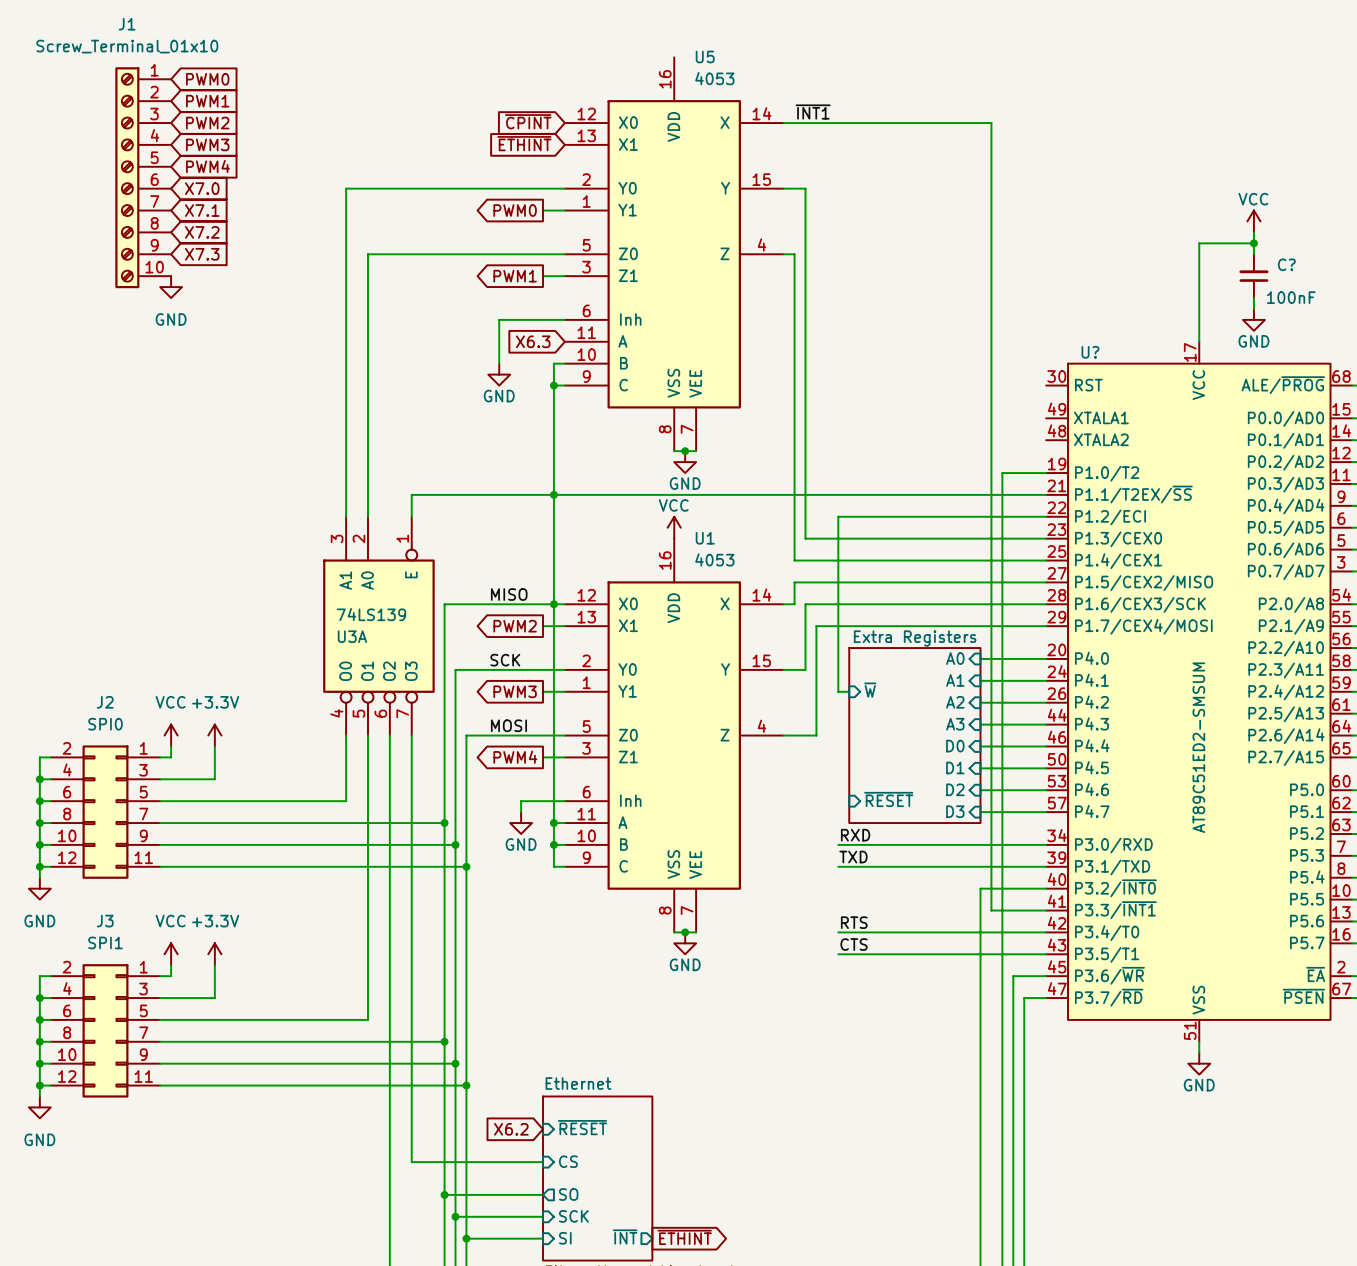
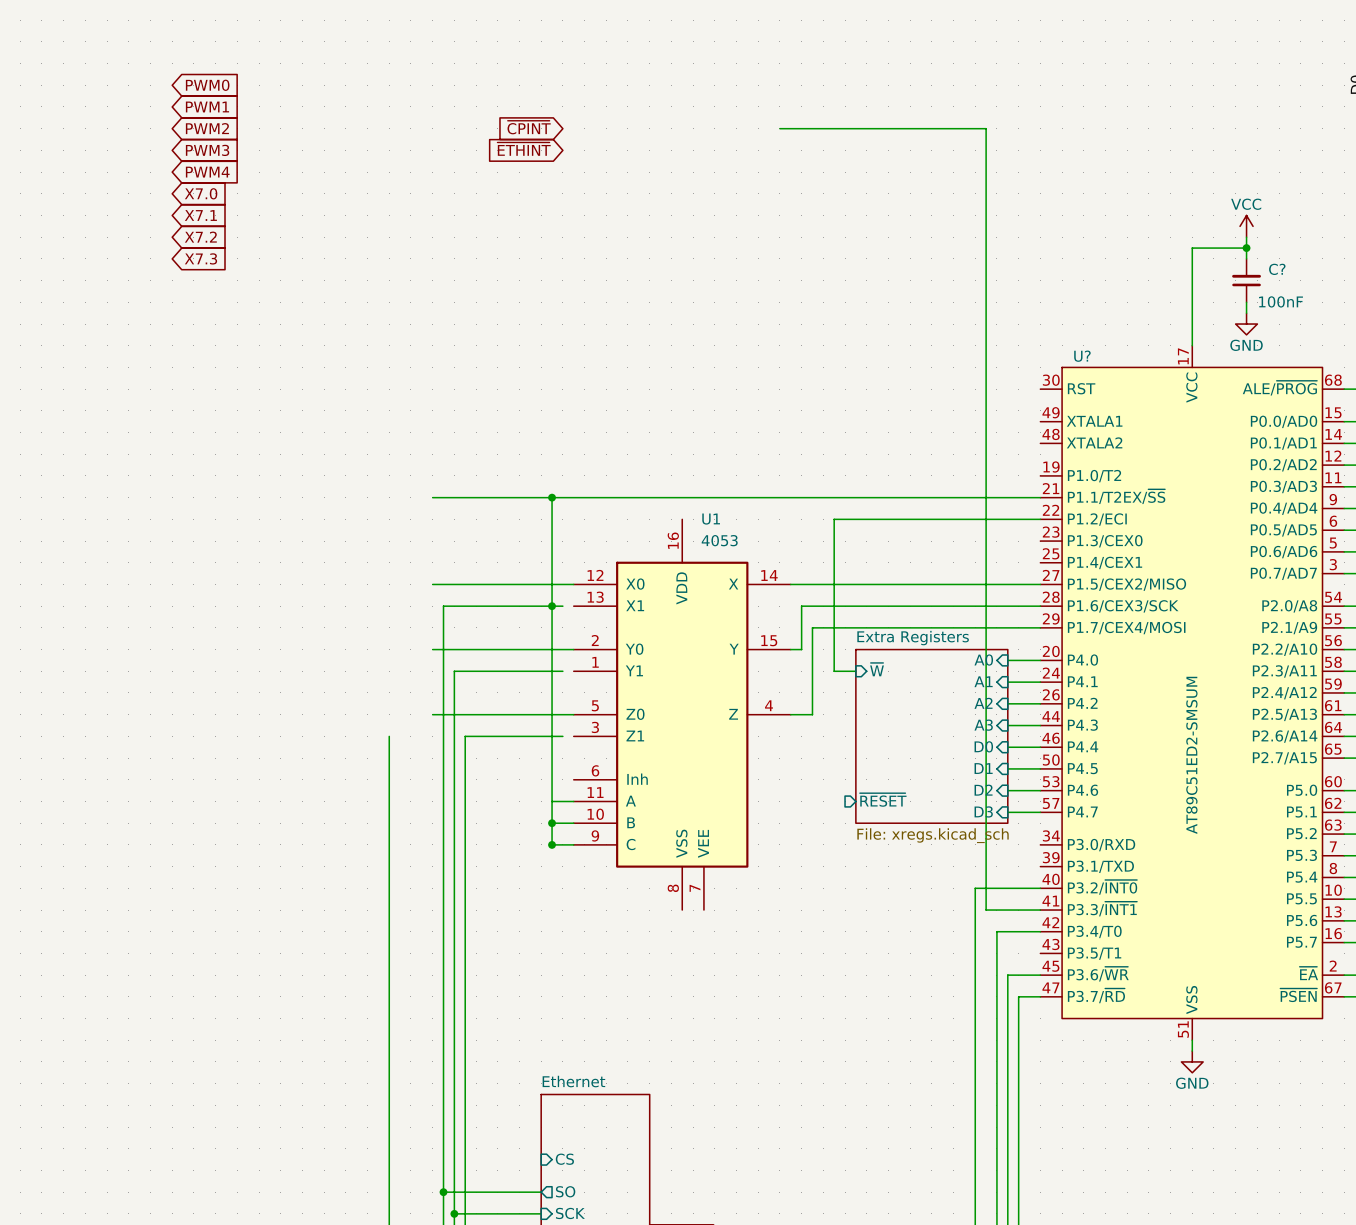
label: ~{INT1} (813, 112) -> none
J1: Screw_Terminal_01x10 (143, 177) -> none
wire: (564, 188) (346, 188) (346, 516) -> none
wire: (783, 188) (805, 188) (805, 538) (1046, 538) -> none
global label: PWM0 (515, 210) -> none
wire: (542, 210) (564, 210) -> none
wire: (564, 254) (367, 254) (367, 516) -> none
U5: 4053 (674, 254) -> none
wire: (783, 254) (794, 254) (794, 560) (1046, 560) -> none
global label: PWM1 (515, 276) -> none
wire: (542, 276) (564, 276) -> none
power symbol: GND (171, 287) -> none
wire: (564, 319) (499, 319) (499, 363) -> none
global label: X6.3 (533, 341) -> none
wire: (564, 363) (553, 363) (553, 494) -> none
power symbol: GND (499, 374) -> none
wire: (553, 385) (564, 385) -> none
junction: (553, 385) -> none
wire: (674, 451) (696, 451) -> none
junction: (685, 451) -> none
power symbol: GND (685, 462) -> none
wire: (1046, 473) (1002, 473) (1002, 932) (838, 932) -> none
wire: (433, 494) (411, 494) (411, 516) -> none
power symbol: VCC (674, 527) -> none
wire: none -> (432, 584) (573, 584)
wire: (794, 582) (794, 604) (783, 604) -> none
label: MISO (509, 594) -> none
U3A: 74LS139 (378, 626) -> none
global label: PWM2 (515, 626) -> none
wire: (542, 626) (564, 626) -> none
wire: none -> (432, 649) (573, 649)
wire: (805, 648) (805, 669) (783, 669) -> (801, 649) (790, 649)
sheet pin position: A0 (955, 658) -> A0 (983, 660)
wire: (980, 658) (1013, 658) -> none
label: SCK (505, 660) -> none
wire: (838, 669) (838, 691) (849, 691) -> (834, 671) (855, 671)
sheet pin position: A1 (955, 680) -> A1 (983, 681)
wire: (980, 680) (1013, 680) -> none
sheet pin position: ~{W} (870, 690) -> ~{W} (877, 669)
global label: PWM3 (515, 691) -> none
wire: (542, 691) (564, 691) -> none
sheet pin position: A2 (955, 702) -> A2 (983, 703)
wire: (980, 702) (1013, 702) -> none
wire: none -> (432, 714) (573, 714)
wire: (816, 713) (816, 735) (783, 735) -> (812, 714) (790, 714)
sheet pin position: A3 (955, 724) -> A3 (983, 725)
wire: (980, 724) (1013, 724) -> none
label: MOSI (508, 725) -> none
power symbol: VCC (171, 735) -> none
power symbol: +3.3V (214, 735) -> none
wire: (346, 735) (346, 801) (160, 801) -> none
wire: (367, 735) (367, 1019) (160, 1019) -> none
wire: (411, 735) (411, 1162) (542, 1162) -> none
U1 position: (674, 735) -> (682, 714)
sheet Extra Registers: (914, 735) -> none
sheet Extra Registers: none -> File: xregs.kicad_sch (931, 736)
wire: (171, 746) (171, 757) (160, 757) -> none
wire: (214, 746) (214, 779) (160, 779) -> none
sheet pin position: D0 (955, 746) -> D0 (983, 746)
wire: (980, 746) (1013, 746) -> none
wire: (50, 757) (39, 757) (39, 877) -> none
global label: PWM4 (515, 757) -> none
wire: (542, 757) (564, 757) -> none
sheet pin position: D1 (955, 767) -> D1 (983, 768)
wire: (980, 768) (1013, 768) -> none
wire: (39, 779) (50, 779) -> none
junction: (39, 779) -> none
sheet pin position: D2 (955, 789) -> D2 (983, 790)
wire: (980, 790) (1013, 790) -> none
wire: (39, 801) (50, 801) -> none
junction: (39, 801) -> none
wire: (553, 801) (521, 801) (521, 812) -> none
sheet pin position: D3 (955, 811) -> D3 (983, 811)
J2: SPI0 (105, 812) -> none
wire: (980, 812) (1013, 812) -> none
wire: (39, 823) (50, 823) -> none
junction: (39, 823) -> none
wire: (160, 823) (444, 823) -> none
junction: (444, 823) -> none
power symbol: GND (521, 823) -> none
label: RXD (855, 835) -> none
wire: (39, 844) (50, 844) -> none
junction: (39, 844) -> none
wire: (160, 844) (455, 844) -> none
junction: (455, 844) -> none
wire: (553, 844) (553, 866) (564, 866) -> none
wire: (838, 844) (1046, 844) -> none
label: TXD (853, 857) -> none
wire: (39, 866) (50, 866) -> none
junction: (39, 866) -> none
wire: (160, 866) (466, 866) -> none
junction: (466, 866) -> none
wire: (838, 866) (1046, 866) -> none
power symbol: GND (39, 888) -> none
label: RTS (854, 922) -> none
wire: (674, 932) (696, 932) -> none
junction: (685, 932) -> none
power symbol: GND (685, 943) -> none
label: CTS (854, 944) -> none
power symbol: VCC (171, 954) -> none
power symbol: +3.3V (214, 954) -> none
wire: (838, 954) (1046, 954) -> none
wire: (171, 965) (171, 976) (160, 976) -> none
wire: (214, 965) (214, 998) (160, 998) -> none
wire: (50, 976) (39, 976) (39, 1096) -> none
wire: (39, 998) (50, 998) -> none
junction: (39, 998) -> none
wire: (39, 1019) (50, 1019) -> none
junction: (39, 1019) -> none
J3: SPI1 (105, 1030) -> none
wire: (39, 1041) (50, 1041) -> none
junction: (39, 1041) -> none
wire: (160, 1041) (444, 1041) -> none
junction: (444, 1041) -> none
wire: (39, 1063) (50, 1063) -> none
junction: (39, 1063) -> none
wire: (160, 1063) (455, 1063) -> none
junction: (455, 1063) -> none
wire: (39, 1085) (50, 1085) -> none
junction: (39, 1085) -> none
wire: (160, 1085) (466, 1085) -> none
junction: (466, 1085) -> none
power symbol: GND (39, 1107) -> none
sheet pin: ~{RESET} (582, 1127) -> none
global label: X6.2 (511, 1129) -> none

